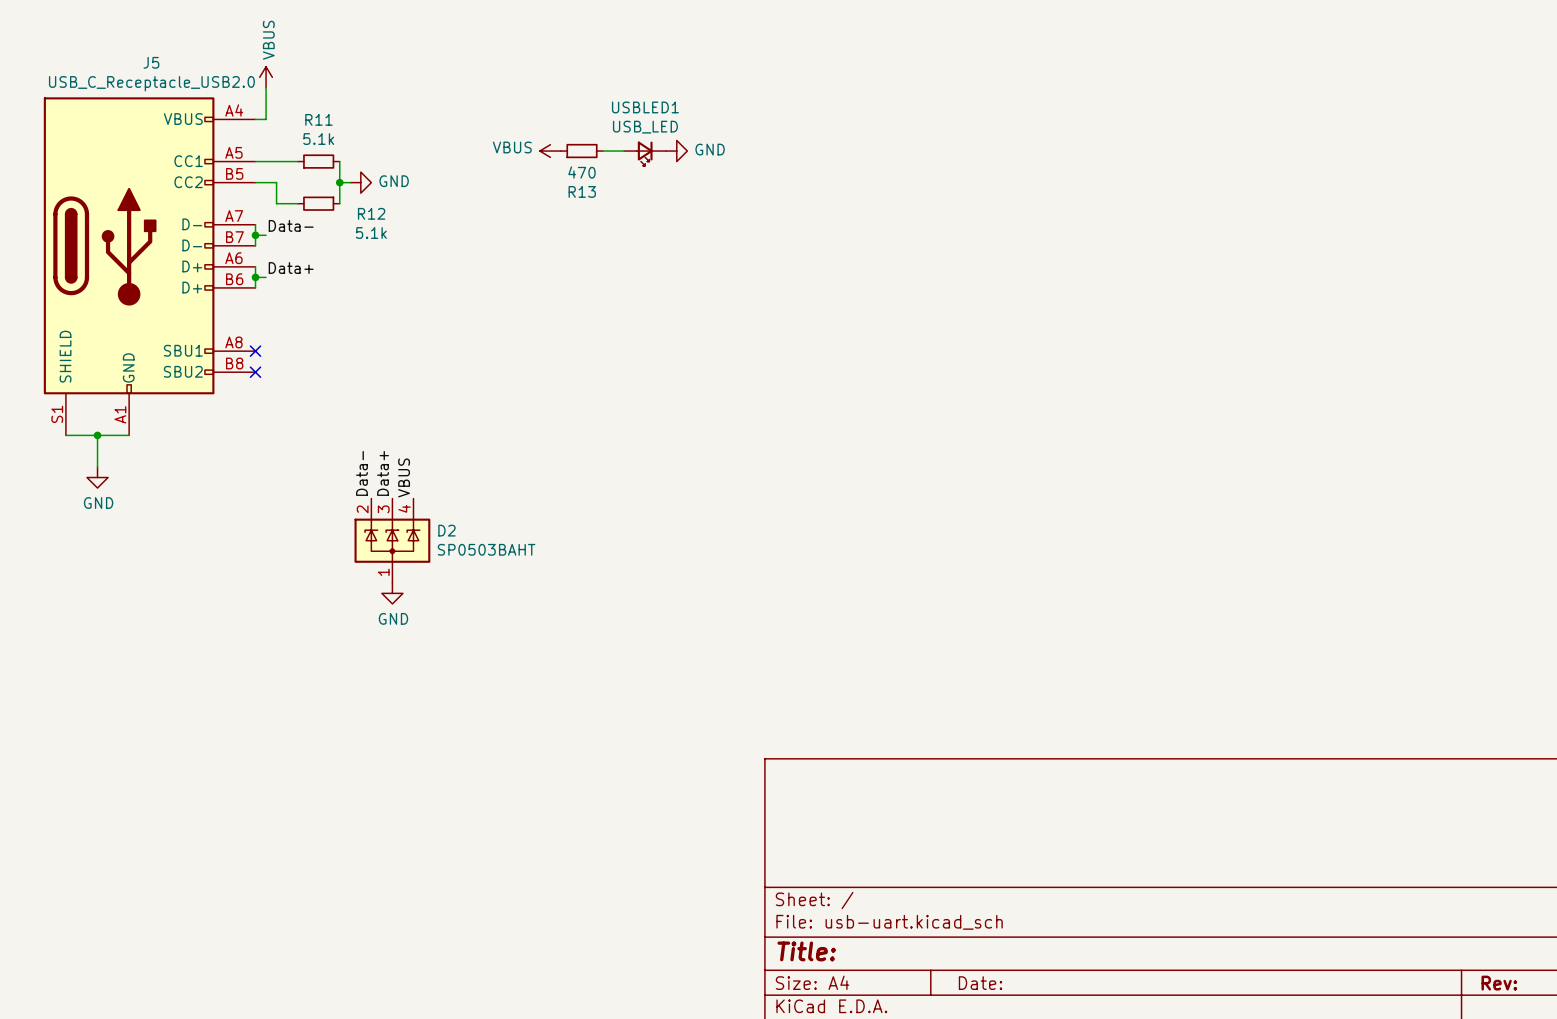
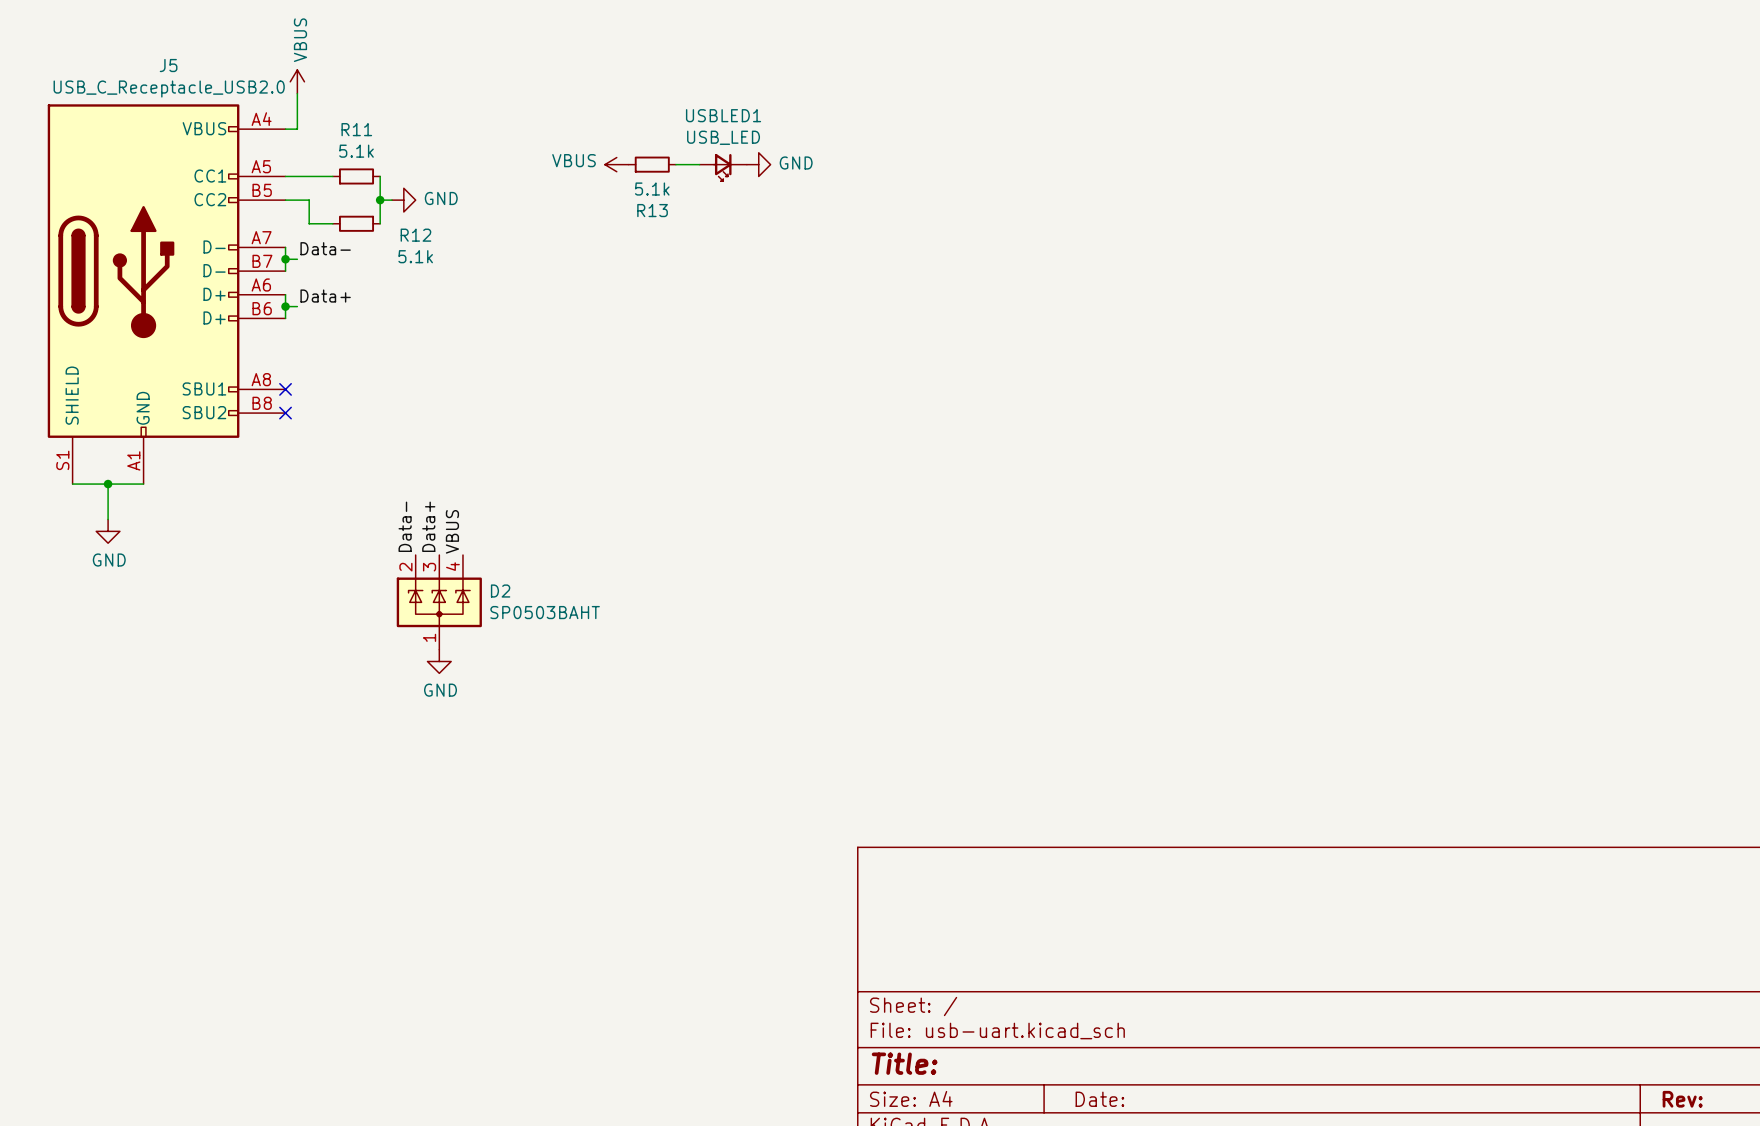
R13 value: 470 (581, 172) -> 5.1k (652, 189)

